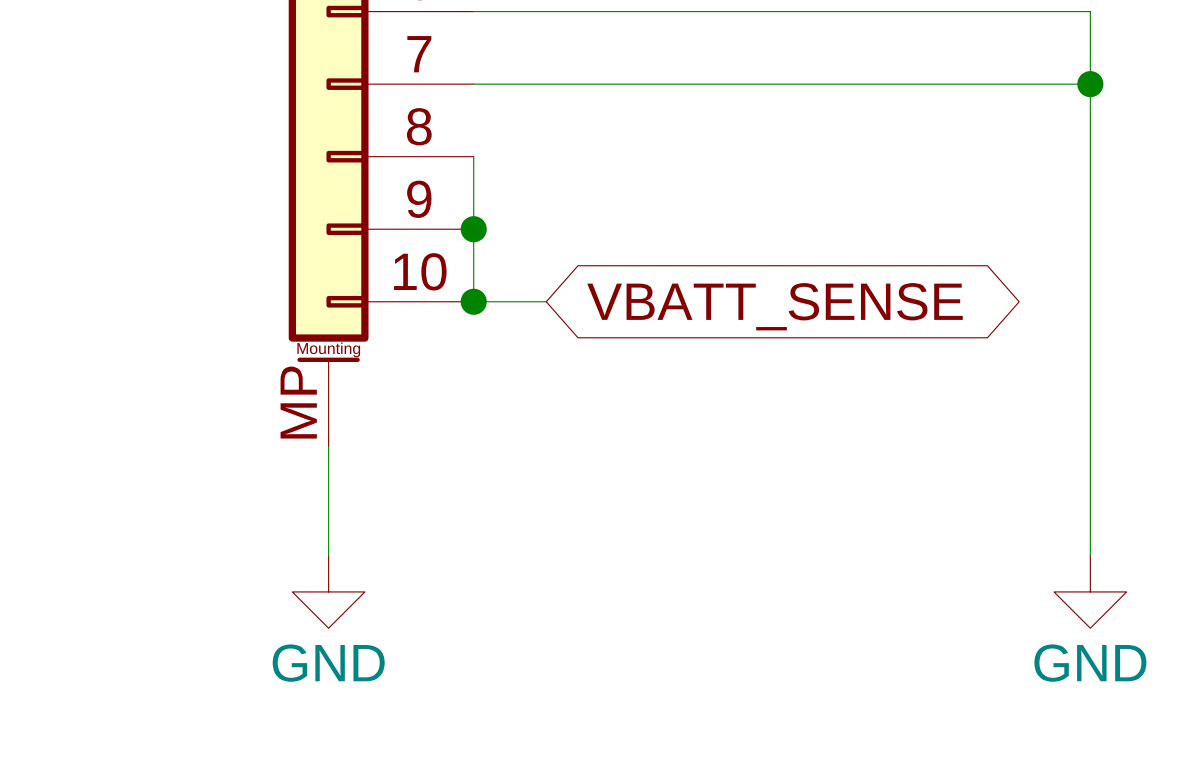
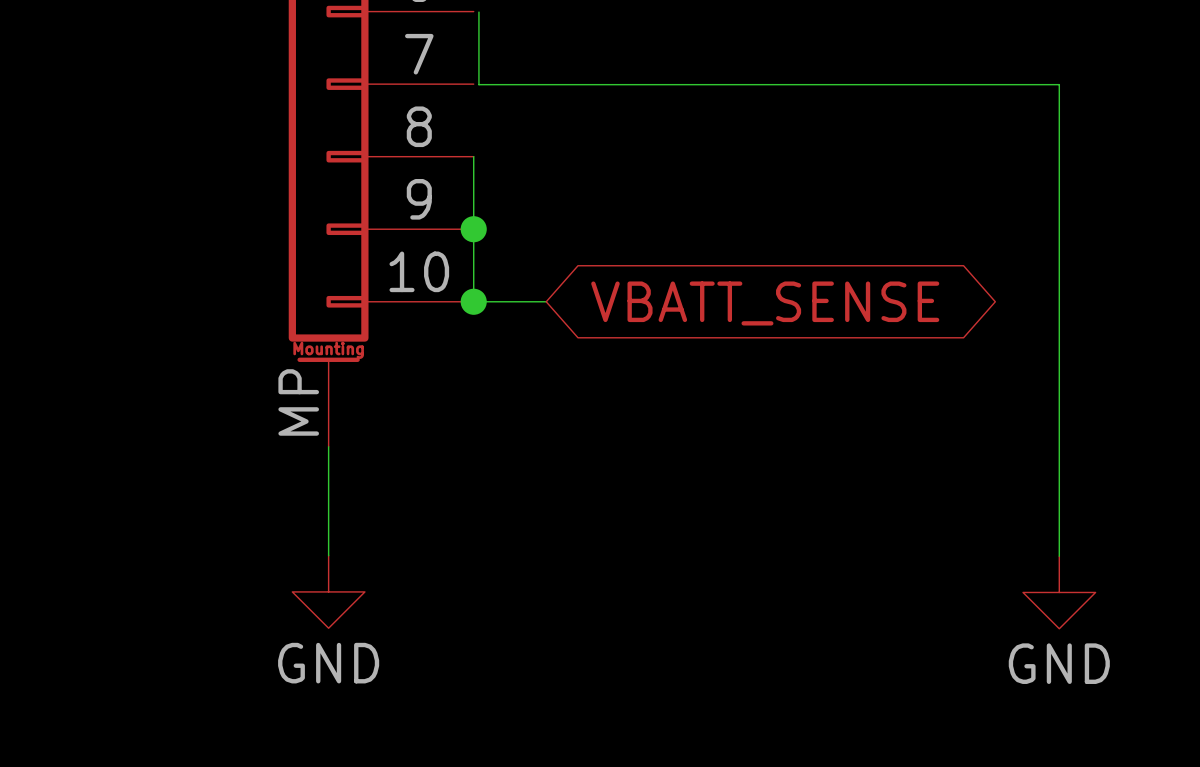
wire: (473, 11) (1090, 11) (1090, 555) -> none
wire: none -> (478, 12) (478, 84) (1059, 84) (1059, 556)
wire: (473, 84) (1090, 84) -> none
junction: (1090, 84) -> none
power symbol position: GND (1090, 591) -> GND (1059, 592)

